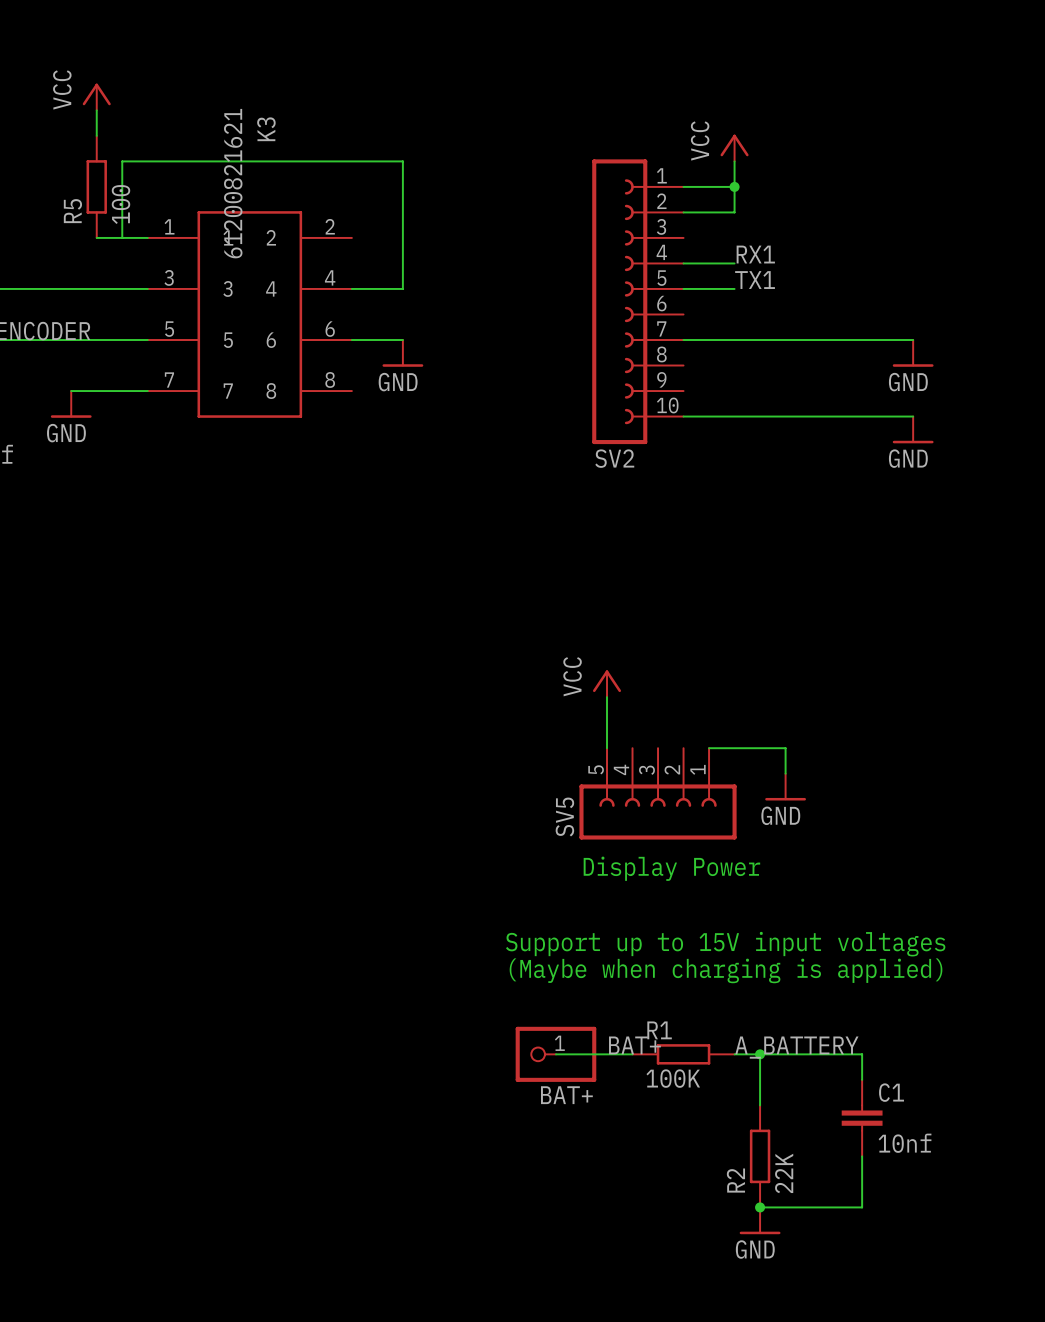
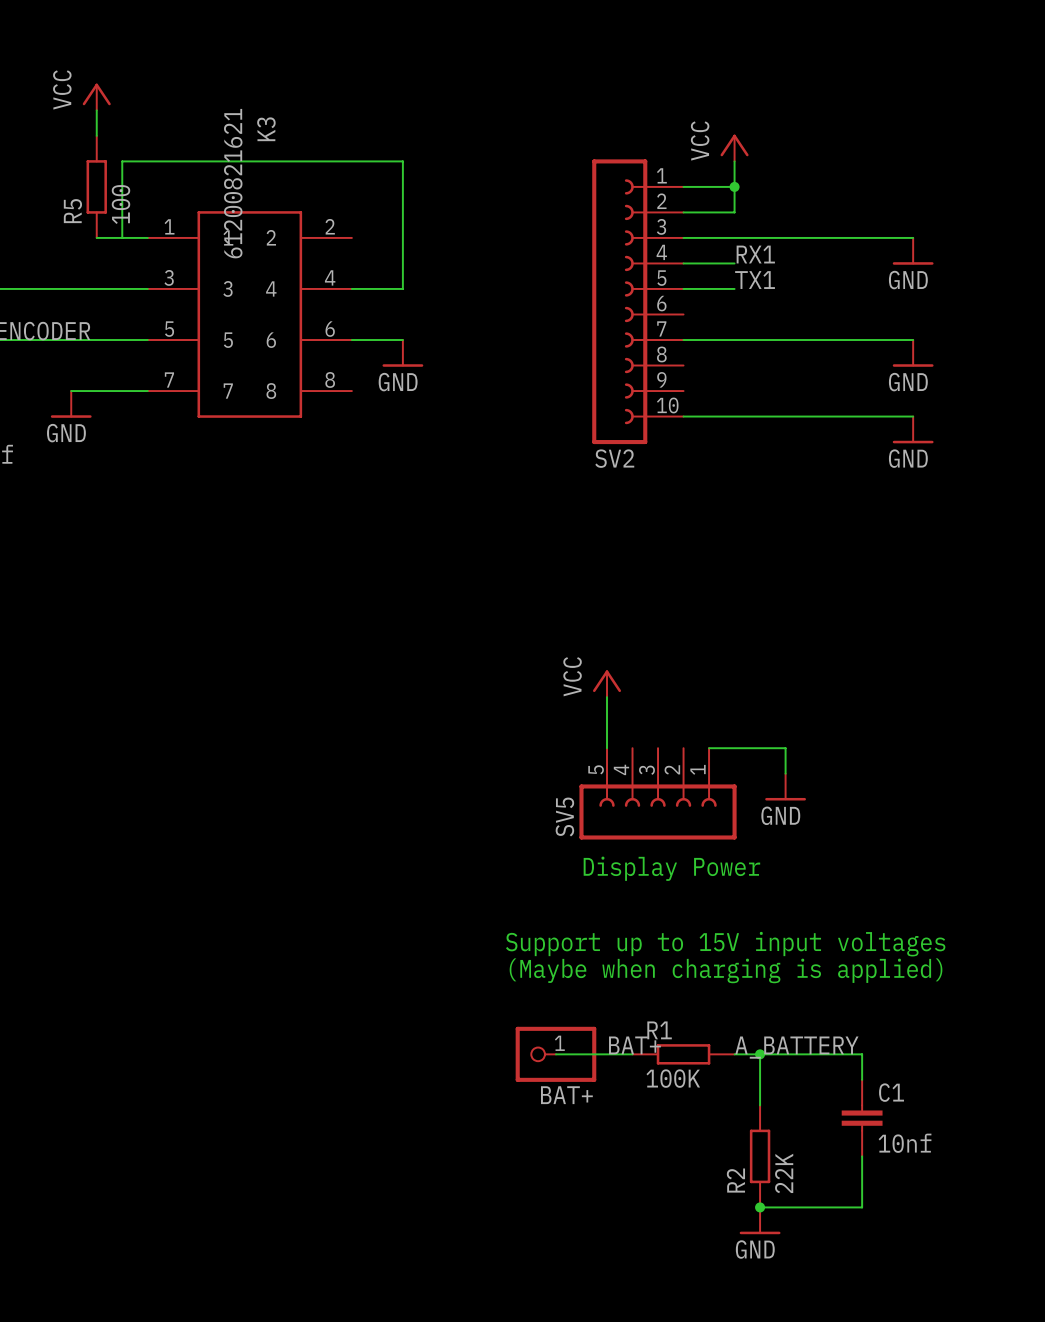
wire: none -> (683, 237) (913, 237)
power symbol: none -> GND (913, 251)

